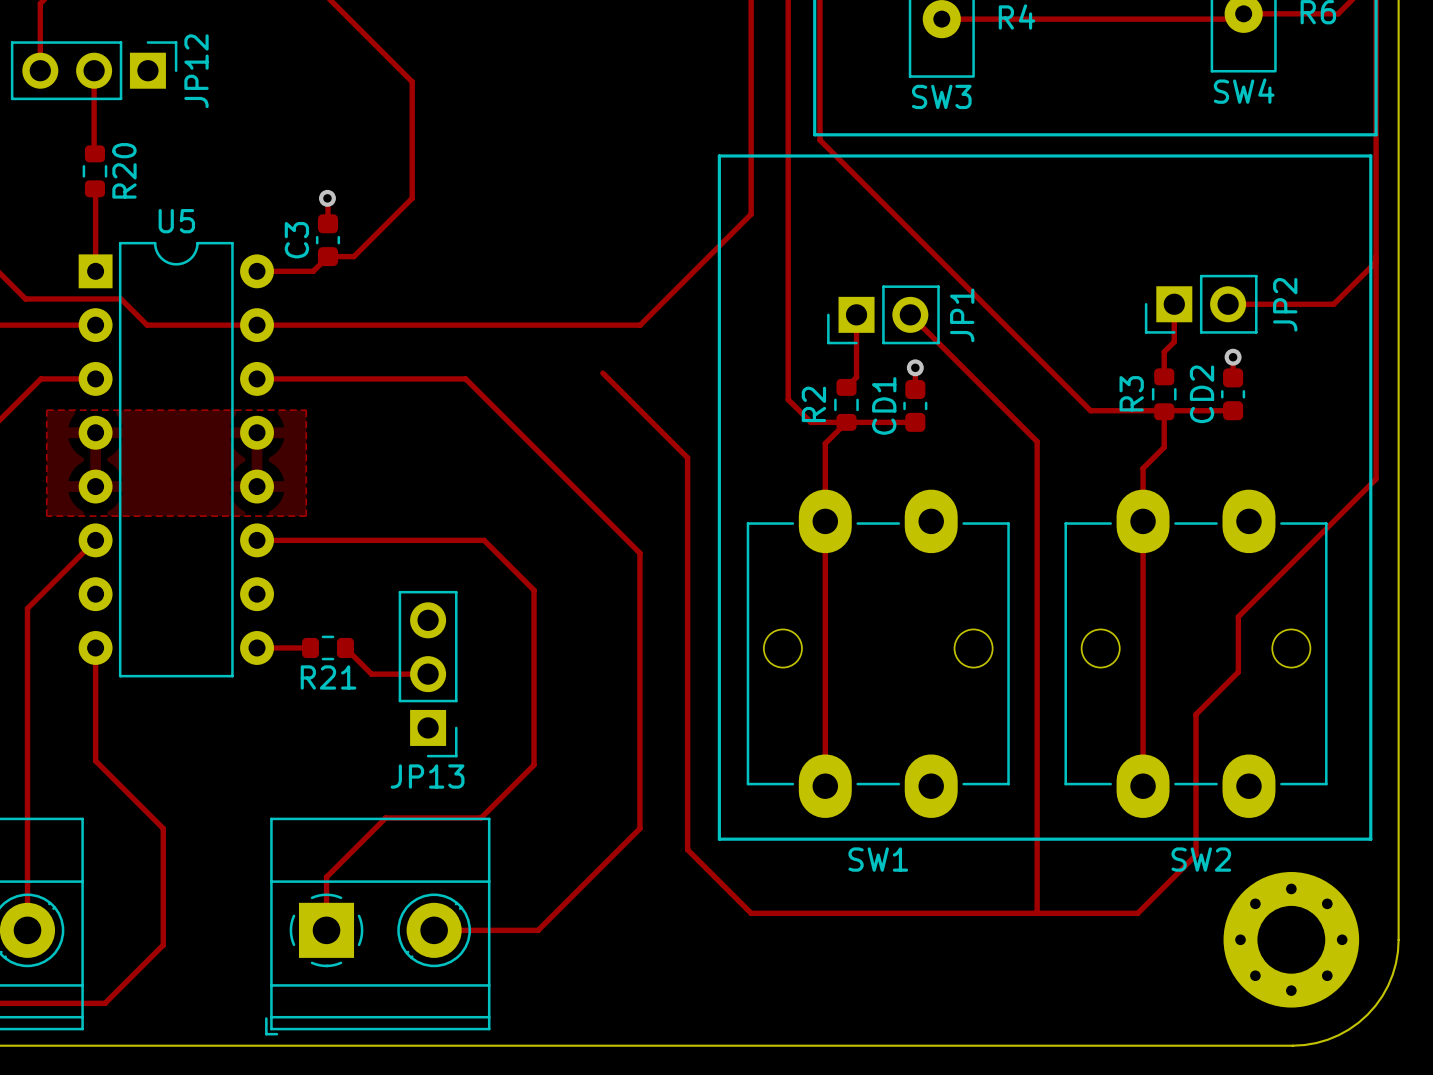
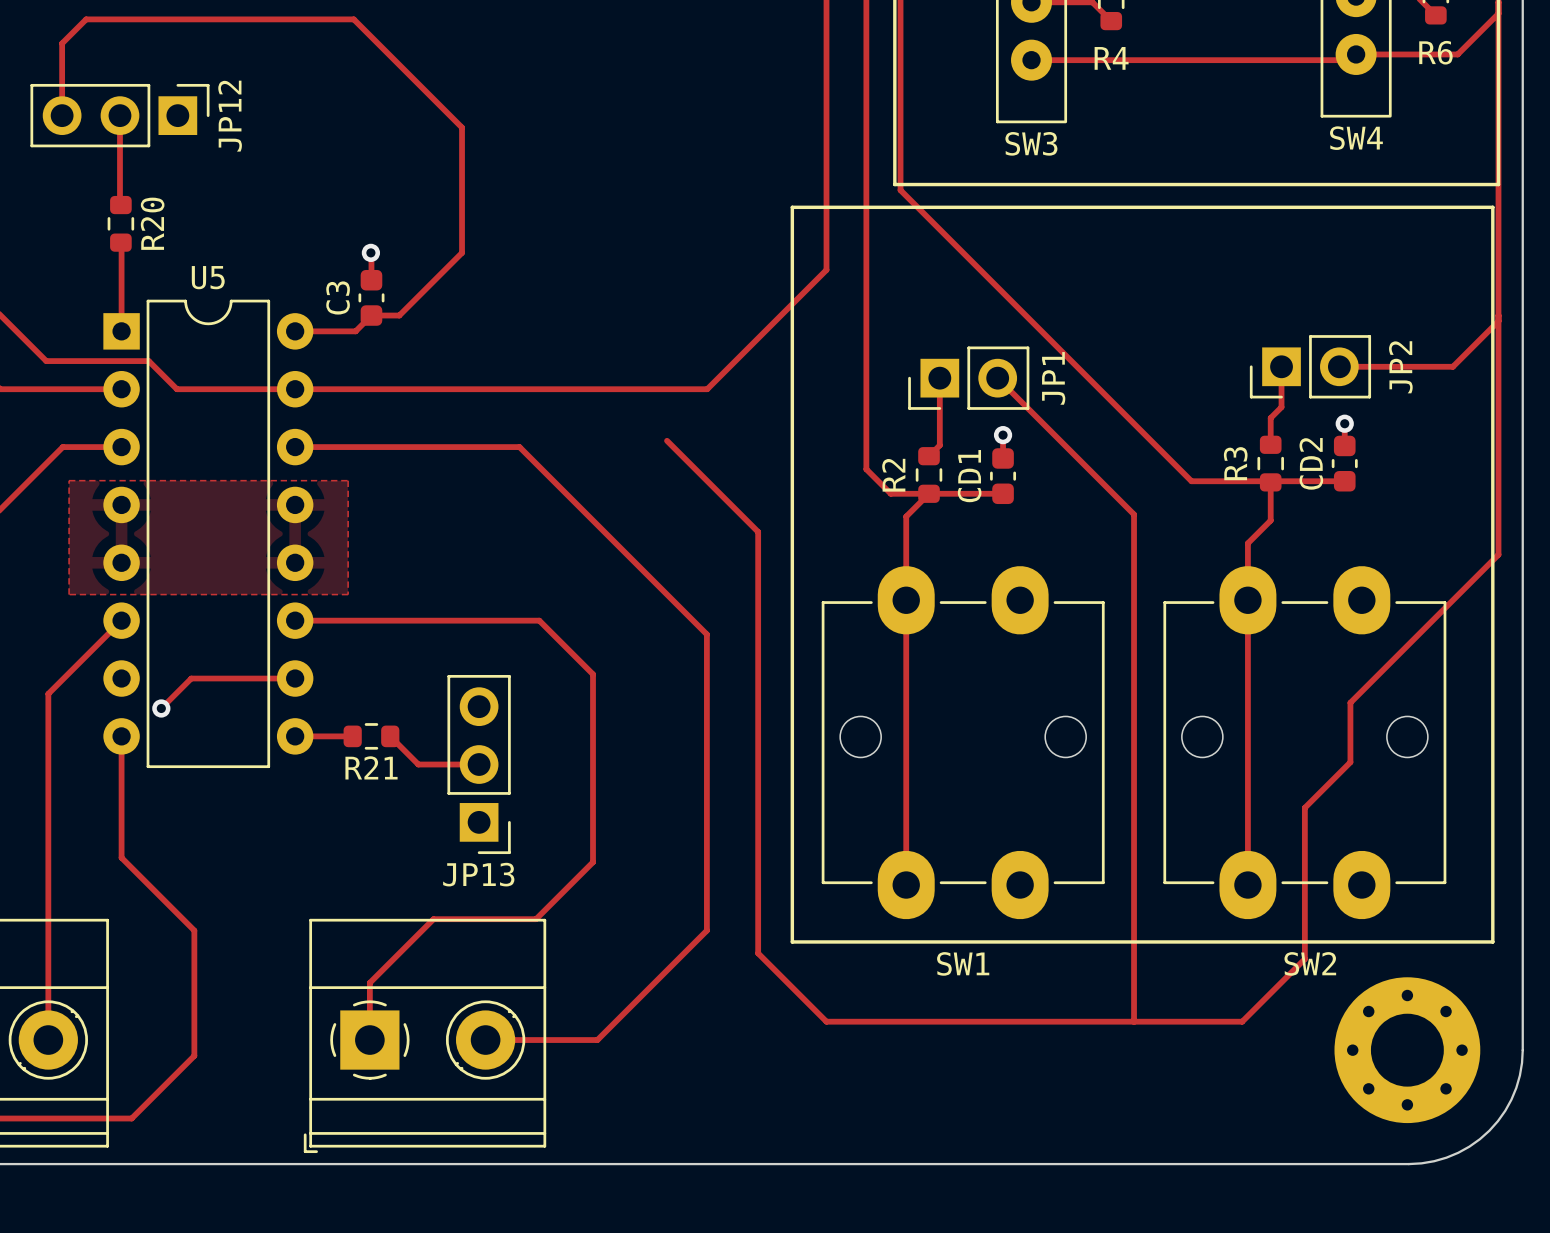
track: none -> (295, 678) (191, 678) (161, 708)
via: none -> (161, 708)

